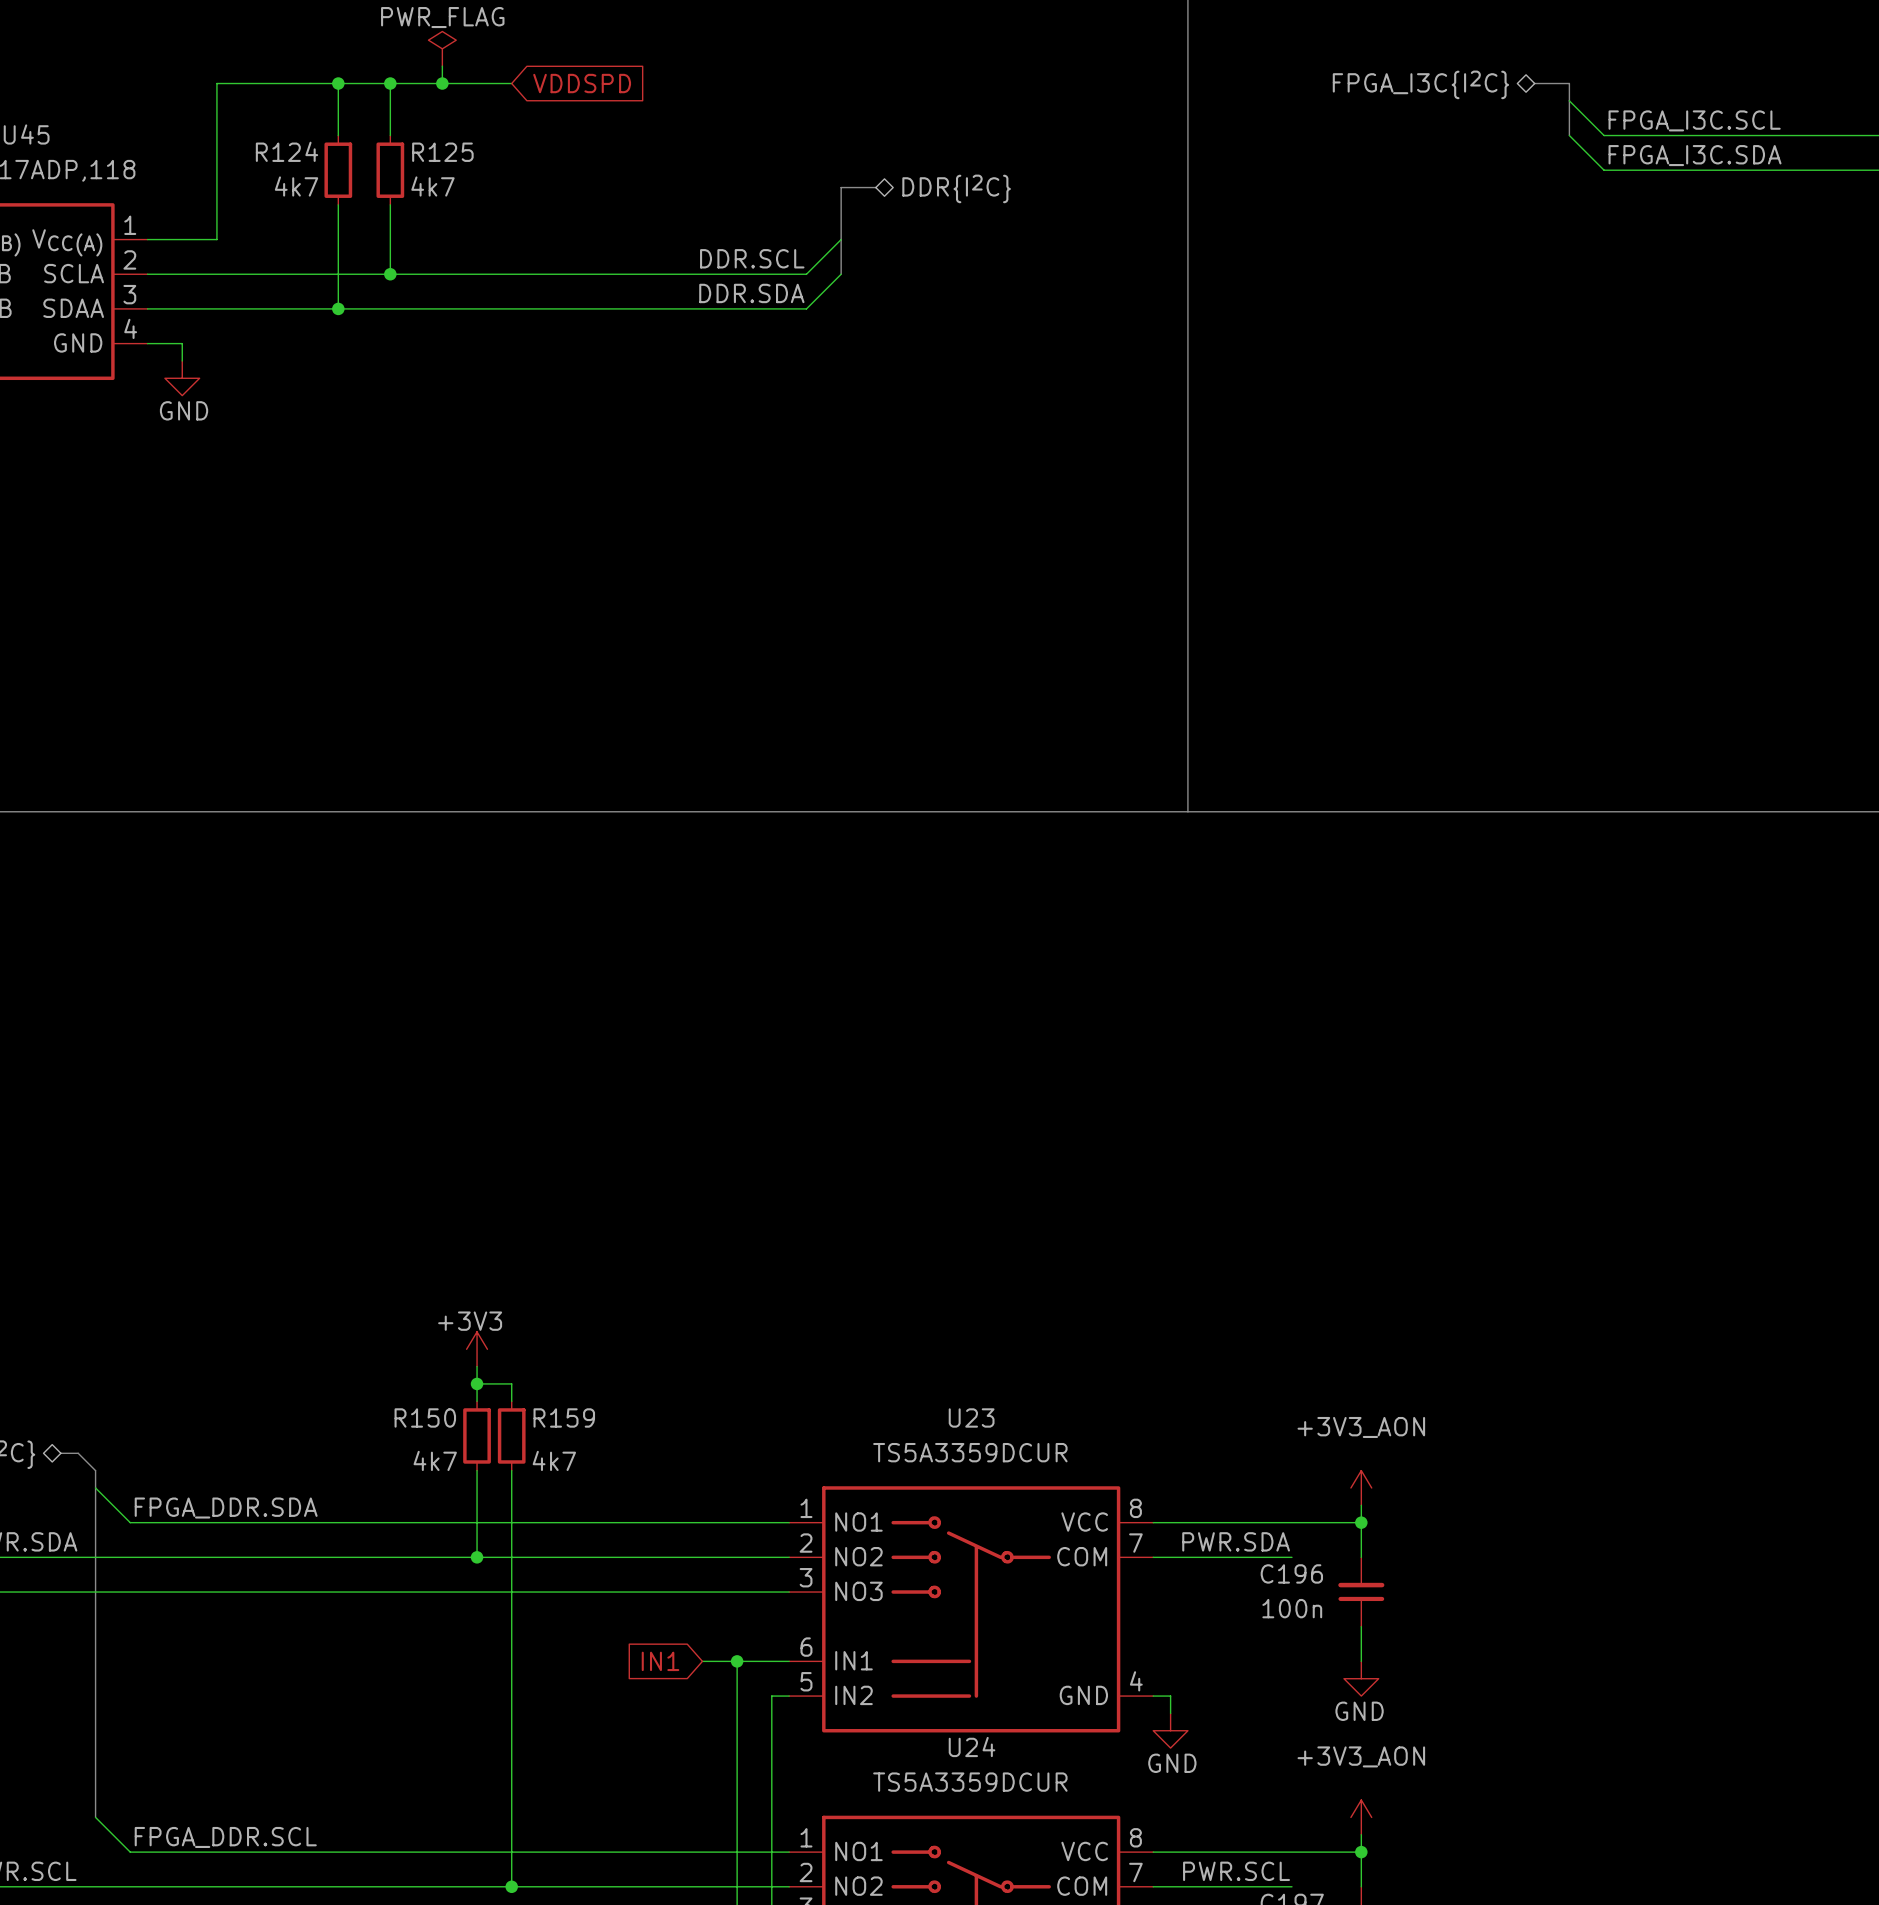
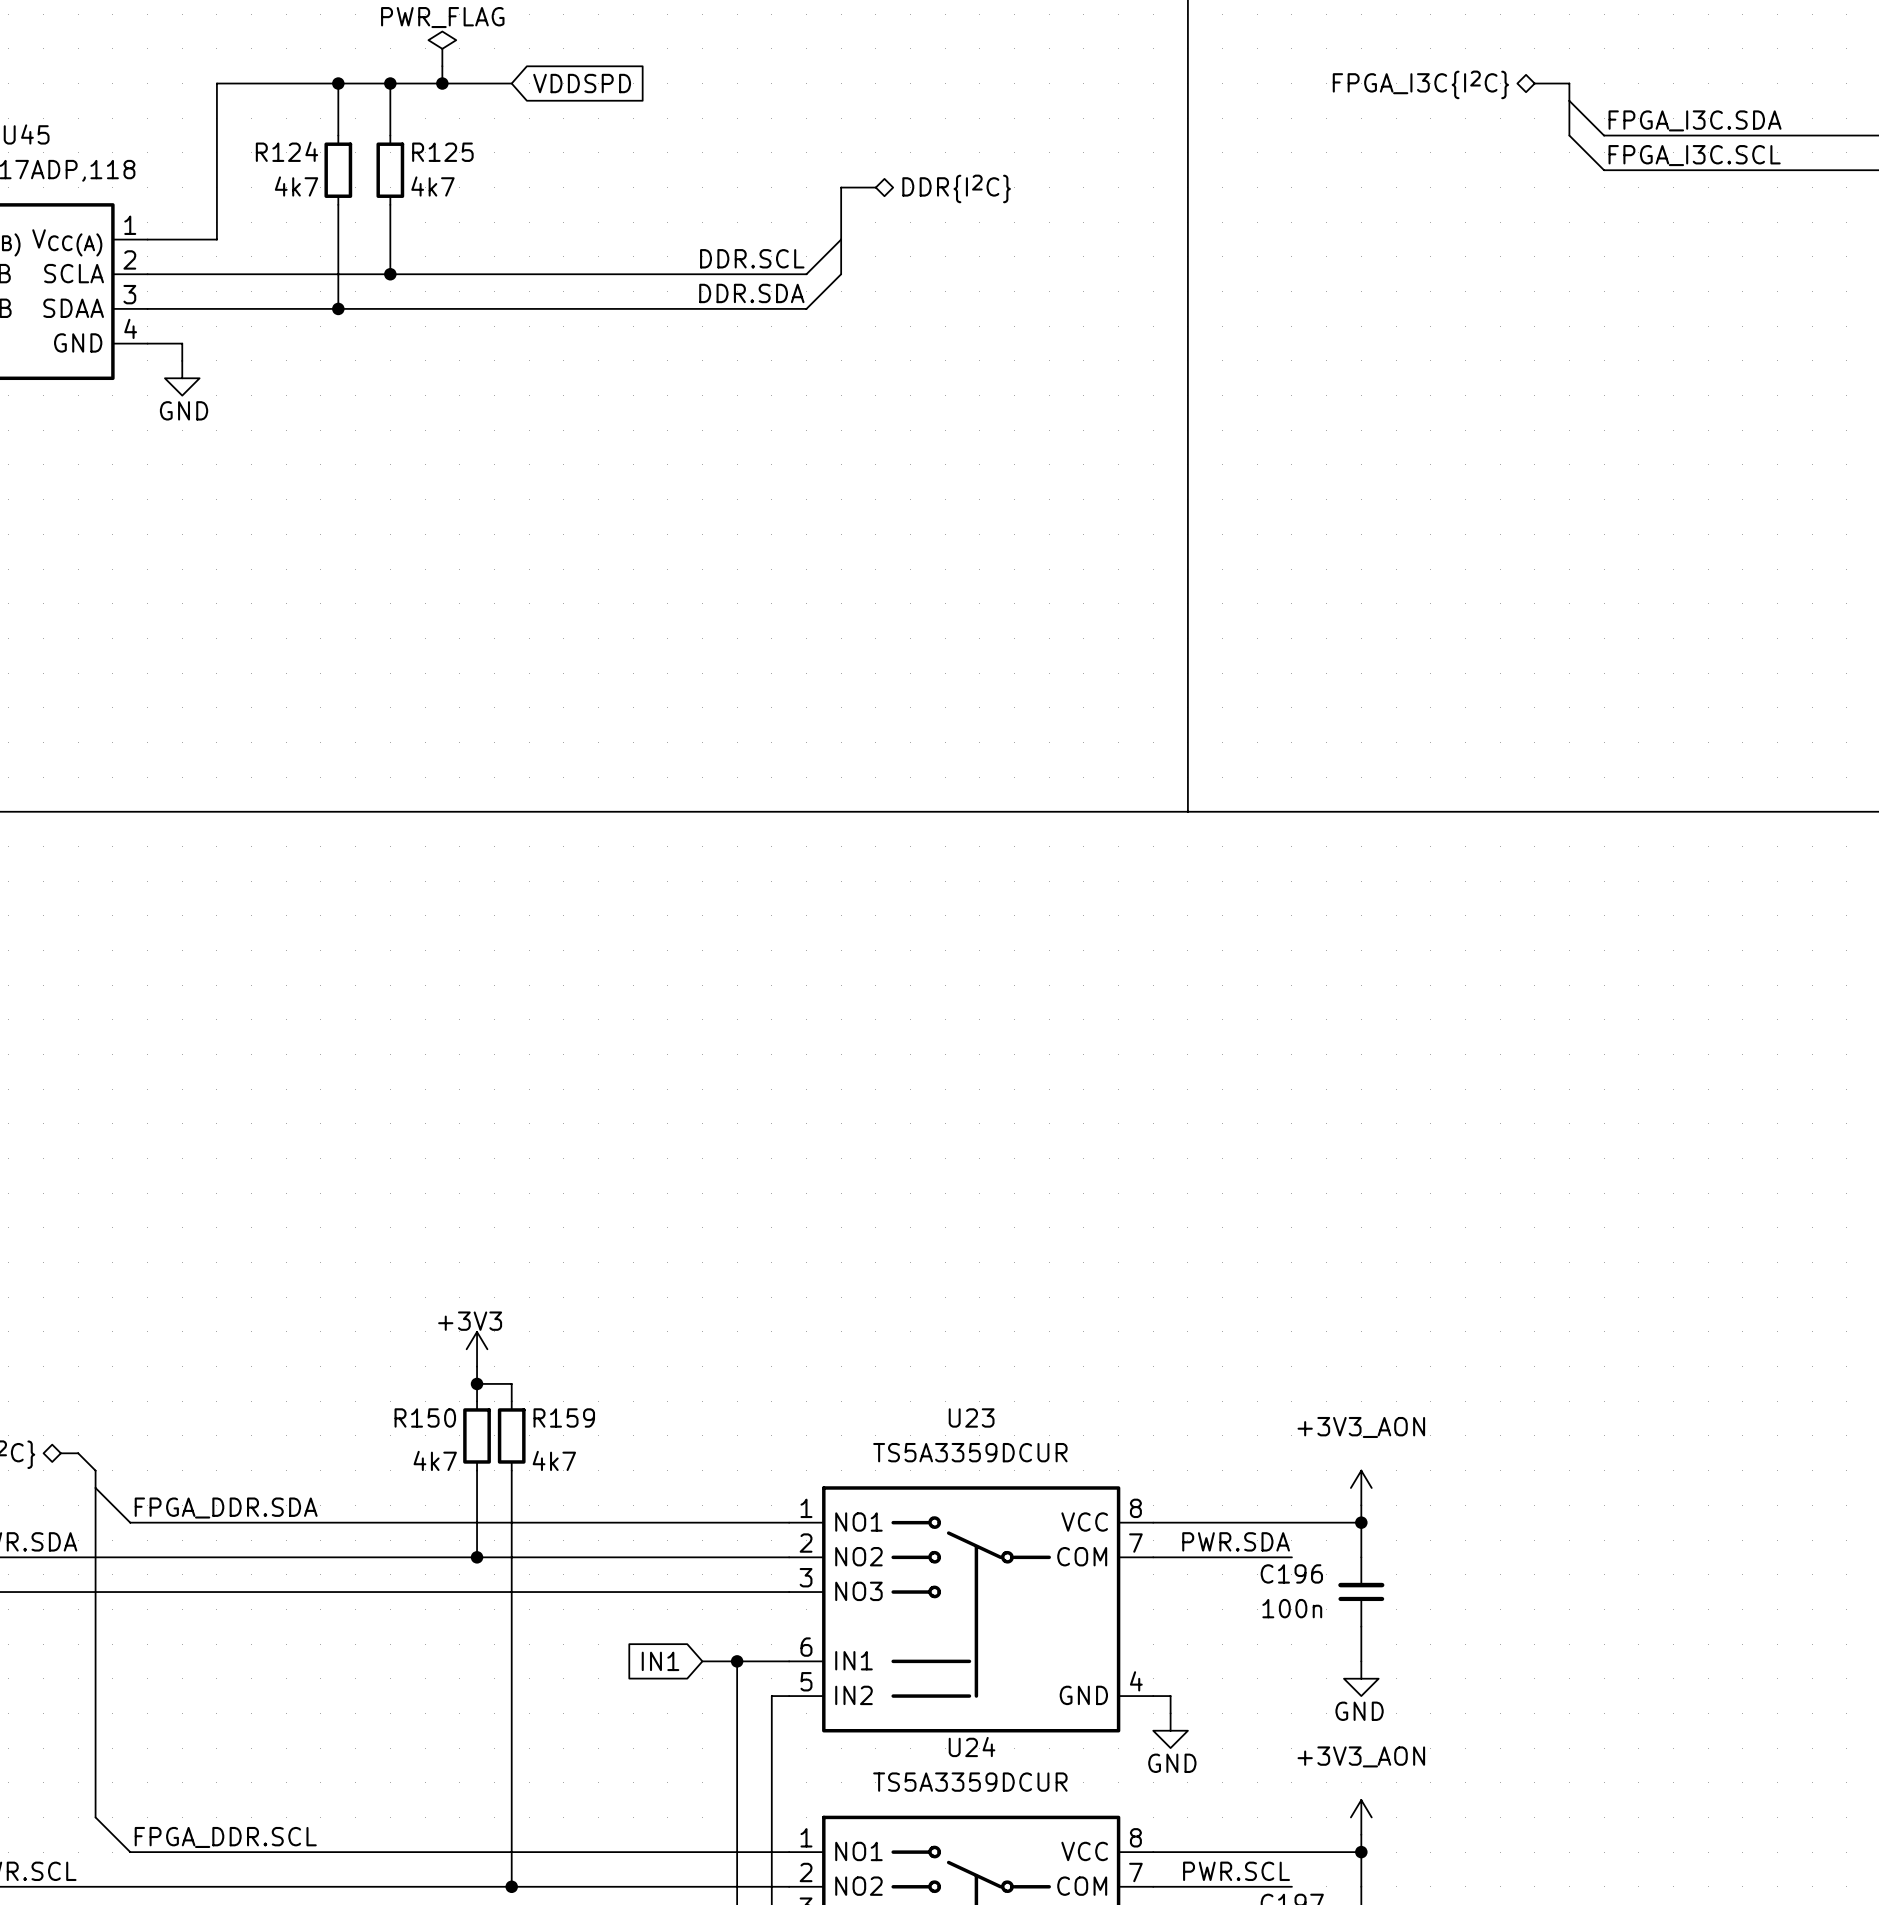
label: FPGA_I3C.SCL (1694, 120) -> FPGA_I3C.SDA (1695, 120)
label: FPGA_I3C.SDA (1695, 155) -> FPGA_I3C.SCL (1694, 155)

